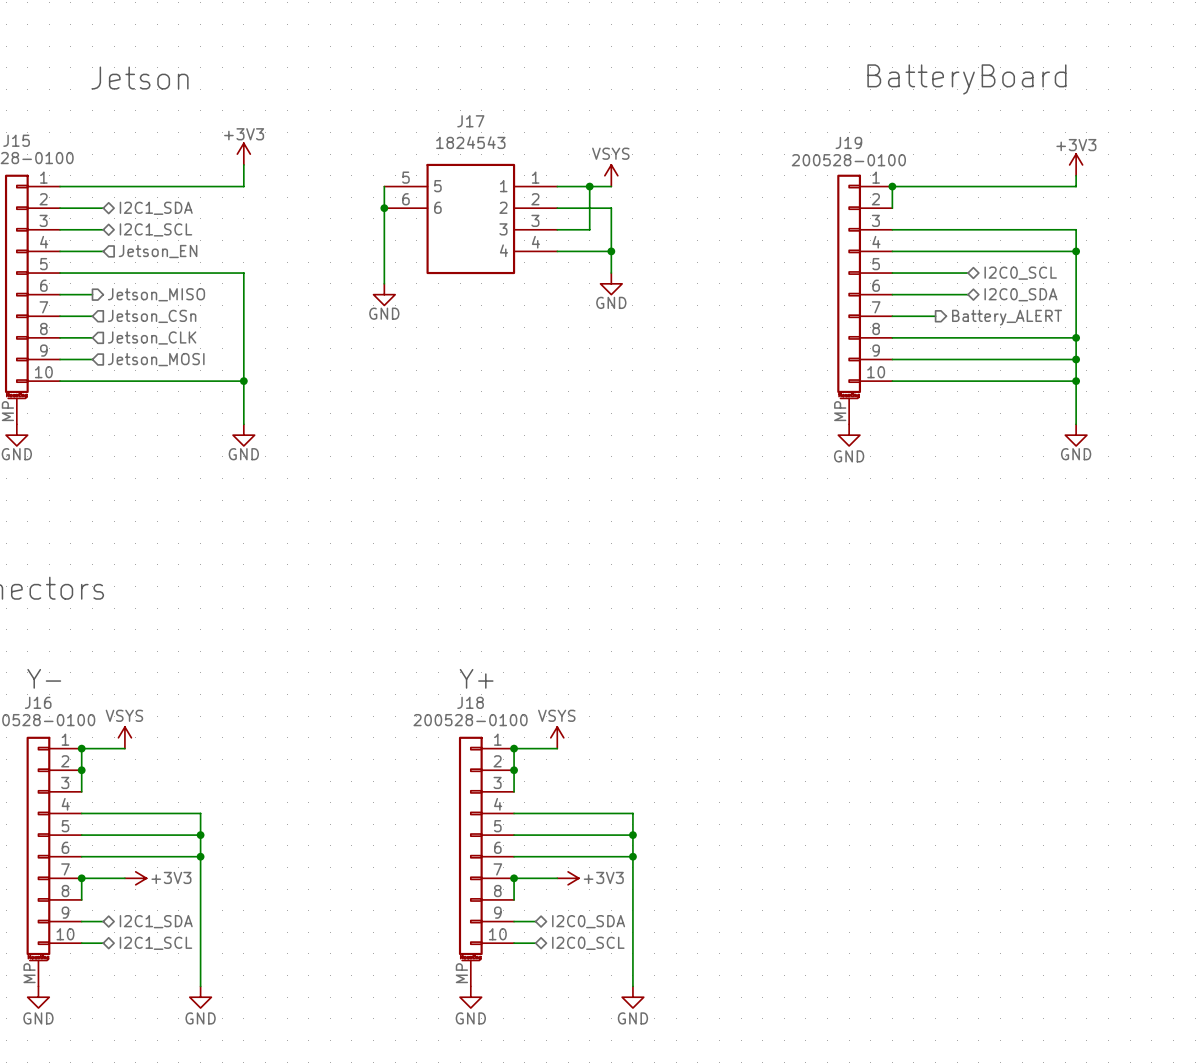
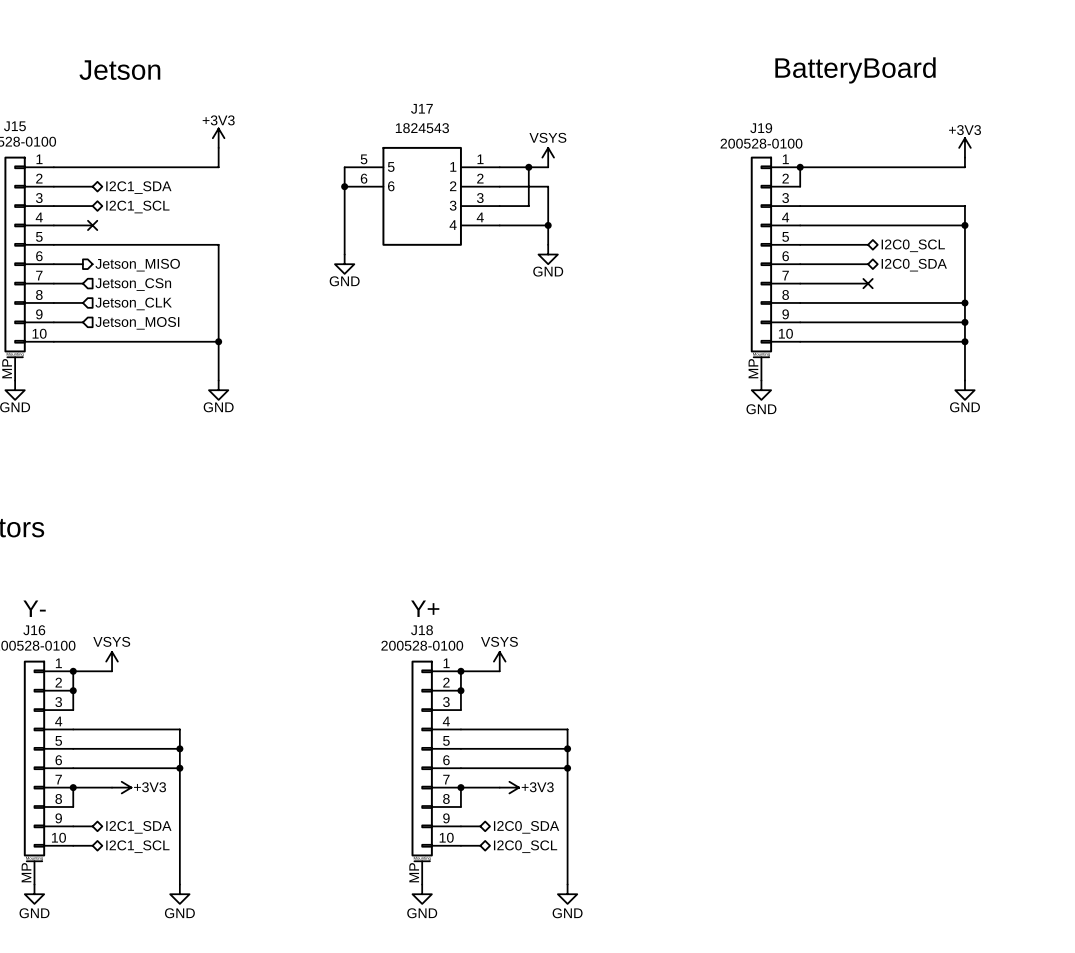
no-connect mark: none -> (92, 225)
hierarchical label: Jetson_EN (158, 251) -> none
wire: none -> (838, 283) (868, 283)
no-connect mark: none -> (868, 283)
hierarchical label: Battery_ALERT (1007, 317) -> none

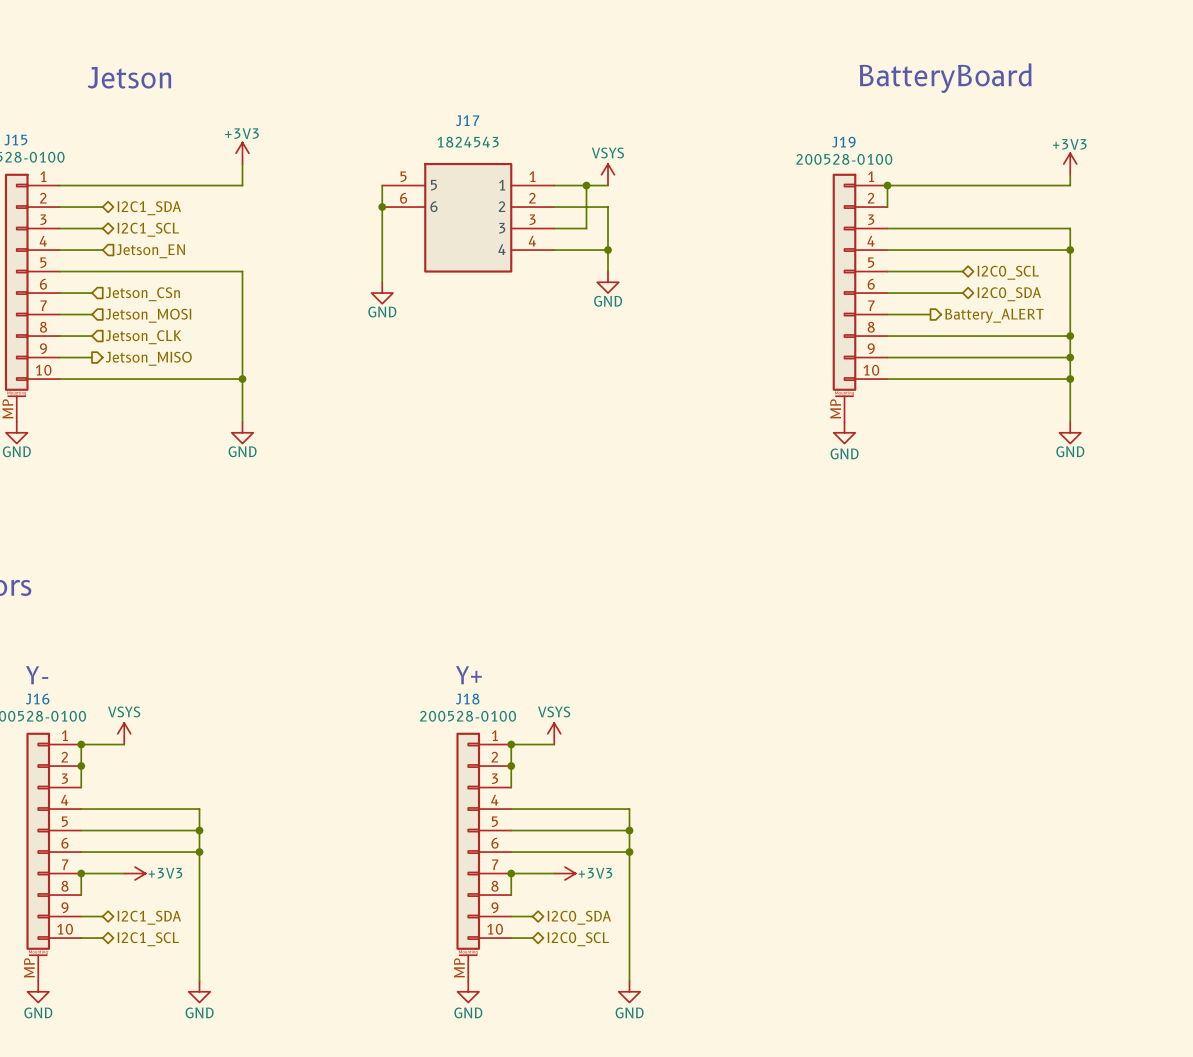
no-connect mark: (92, 225) -> none
hierarchical label: none -> Jetson_EN (150, 251)
hierarchical label shape: output (137, 265) -> input (142, 294)
hierarchical label: Jetson_MISO (137, 265) -> Jetson_CSn (142, 294)
wire: (838, 283) (868, 283) -> none
no-connect mark: (868, 283) -> none
hierarchical label: Jetson_CSn (133, 284) -> Jetson_MOSI (148, 315)
hierarchical label: none -> Battery_ALERT (994, 315)
hierarchical label shape: input (137, 323) -> output (148, 358)
hierarchical label: Jetson_MOSI (137, 323) -> Jetson_MISO (148, 358)

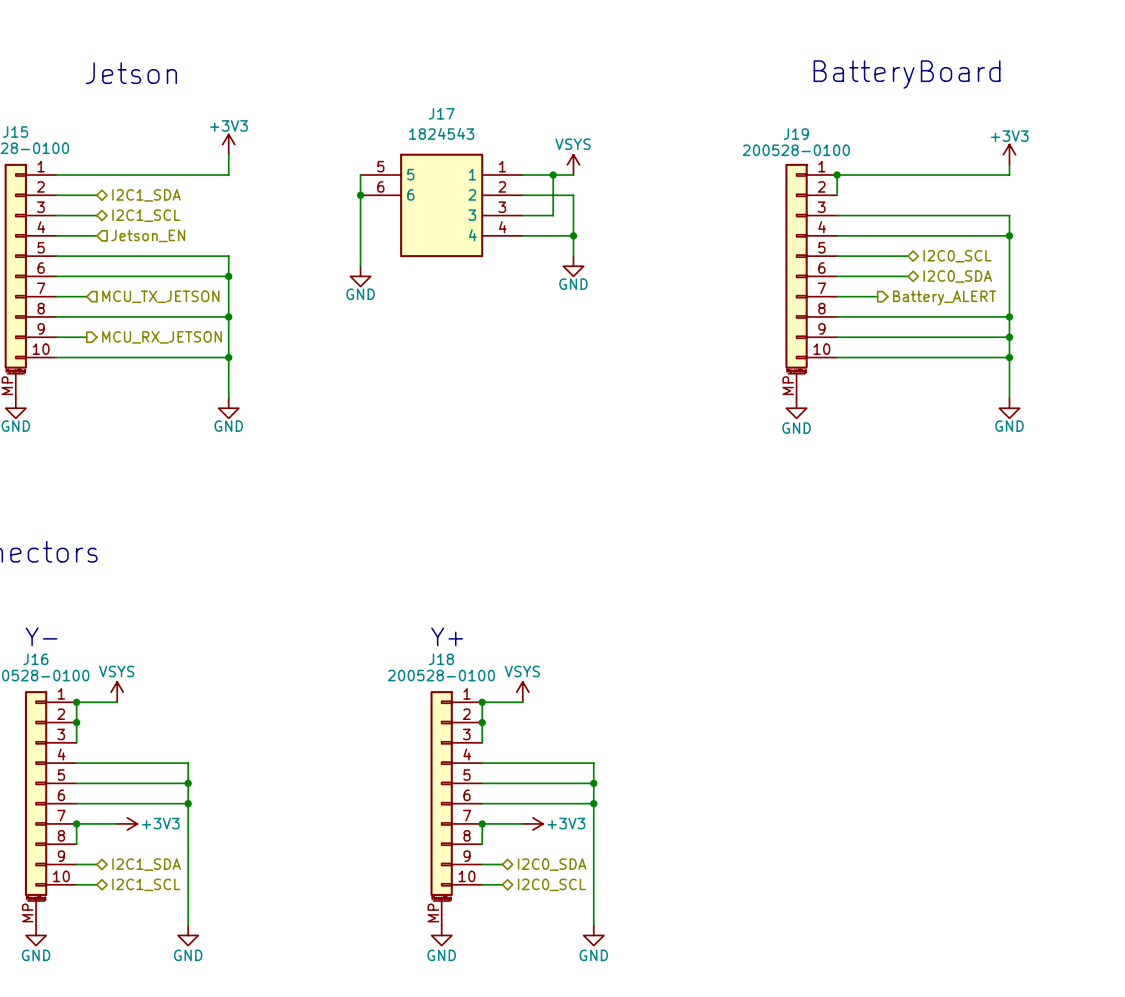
wire: none -> (86, 276) (228, 276)
junction: none -> (228, 276)
hierarchical label: Jetson_CSn (142, 294) -> none
hierarchical label: Jetson_MOSI (148, 315) -> MCU_TX_JETSON (160, 296)
wire: none -> (86, 316) (228, 316)
junction: none -> (228, 316)
hierarchical label: Jetson_CLK (143, 337) -> none
hierarchical label: Jetson_MISO (148, 358) -> MCU_RX_JETSON (162, 337)

